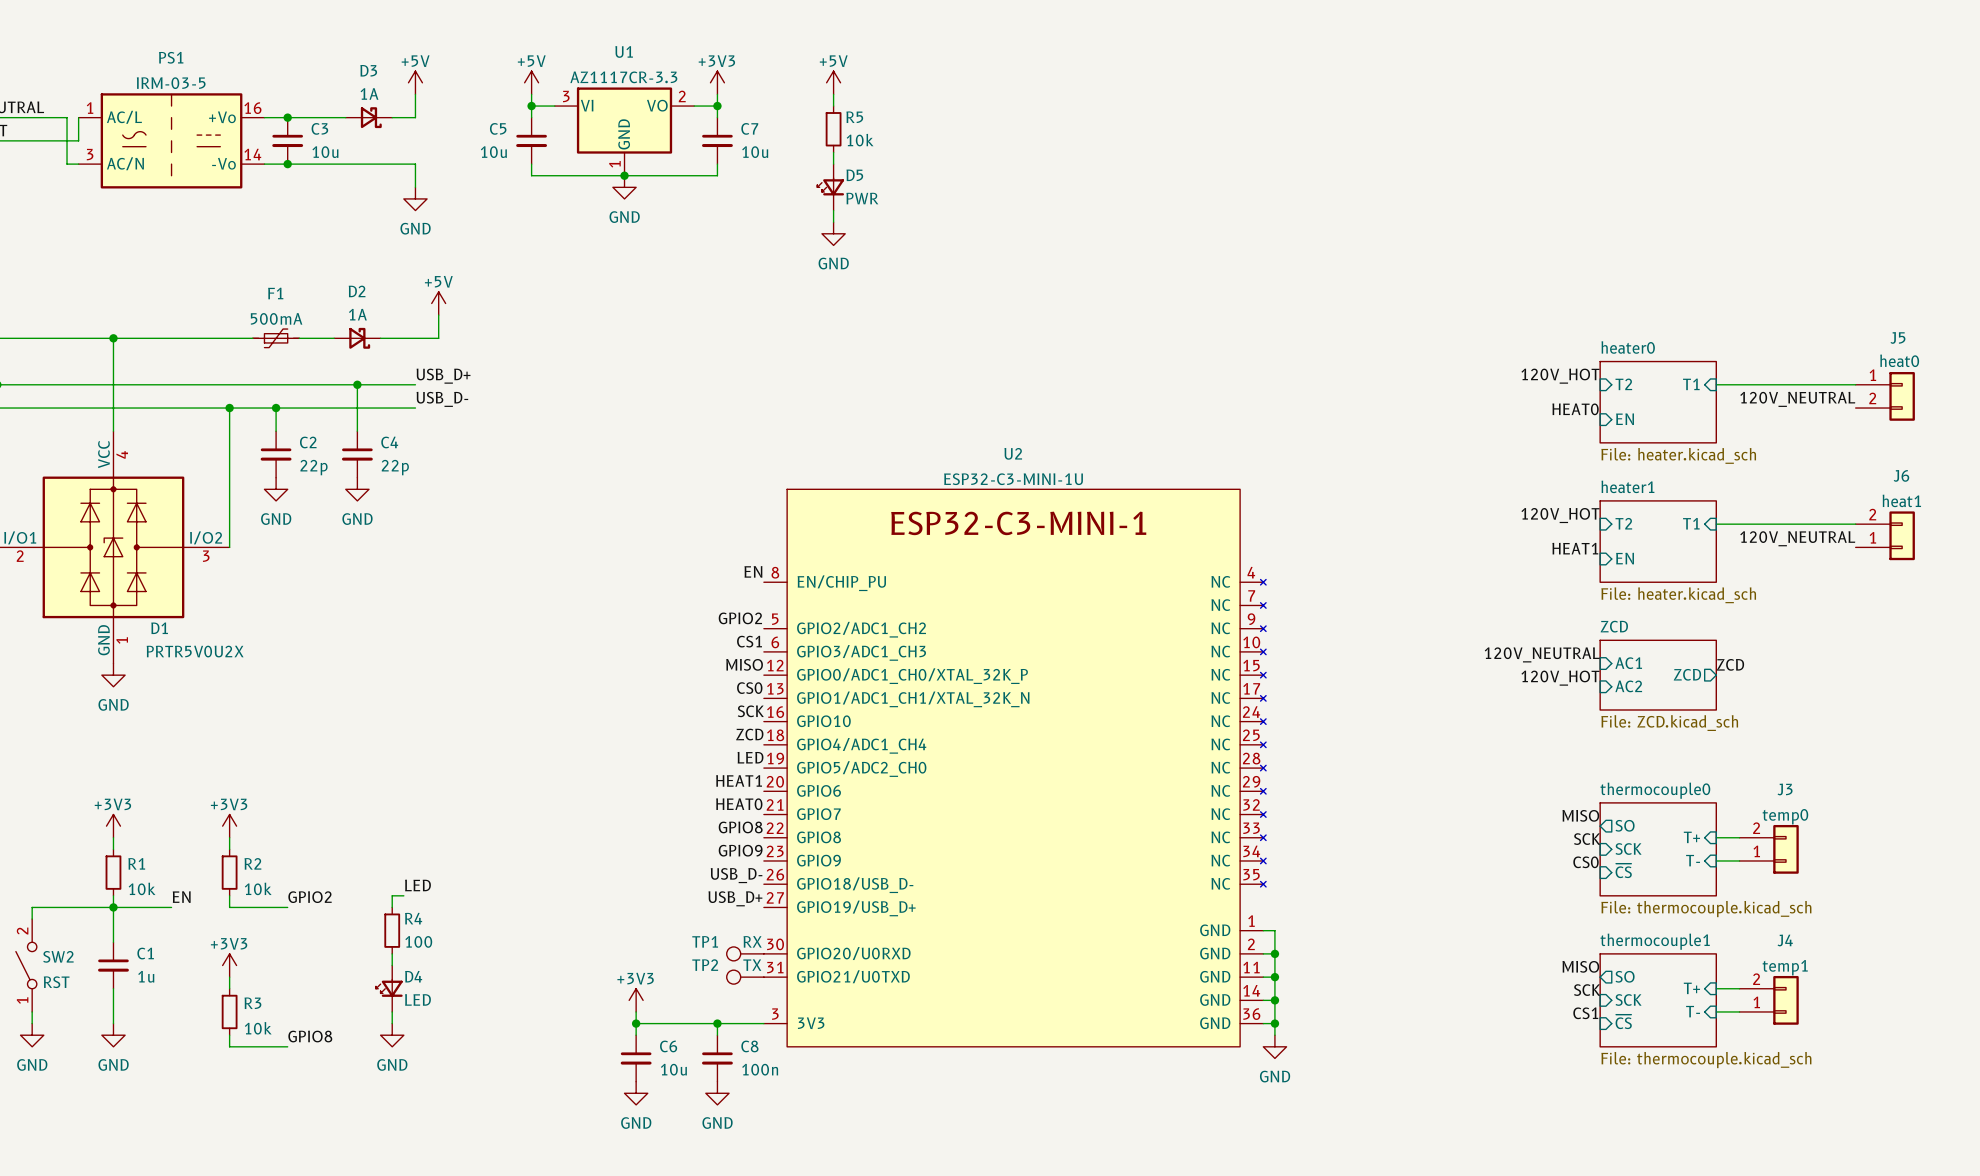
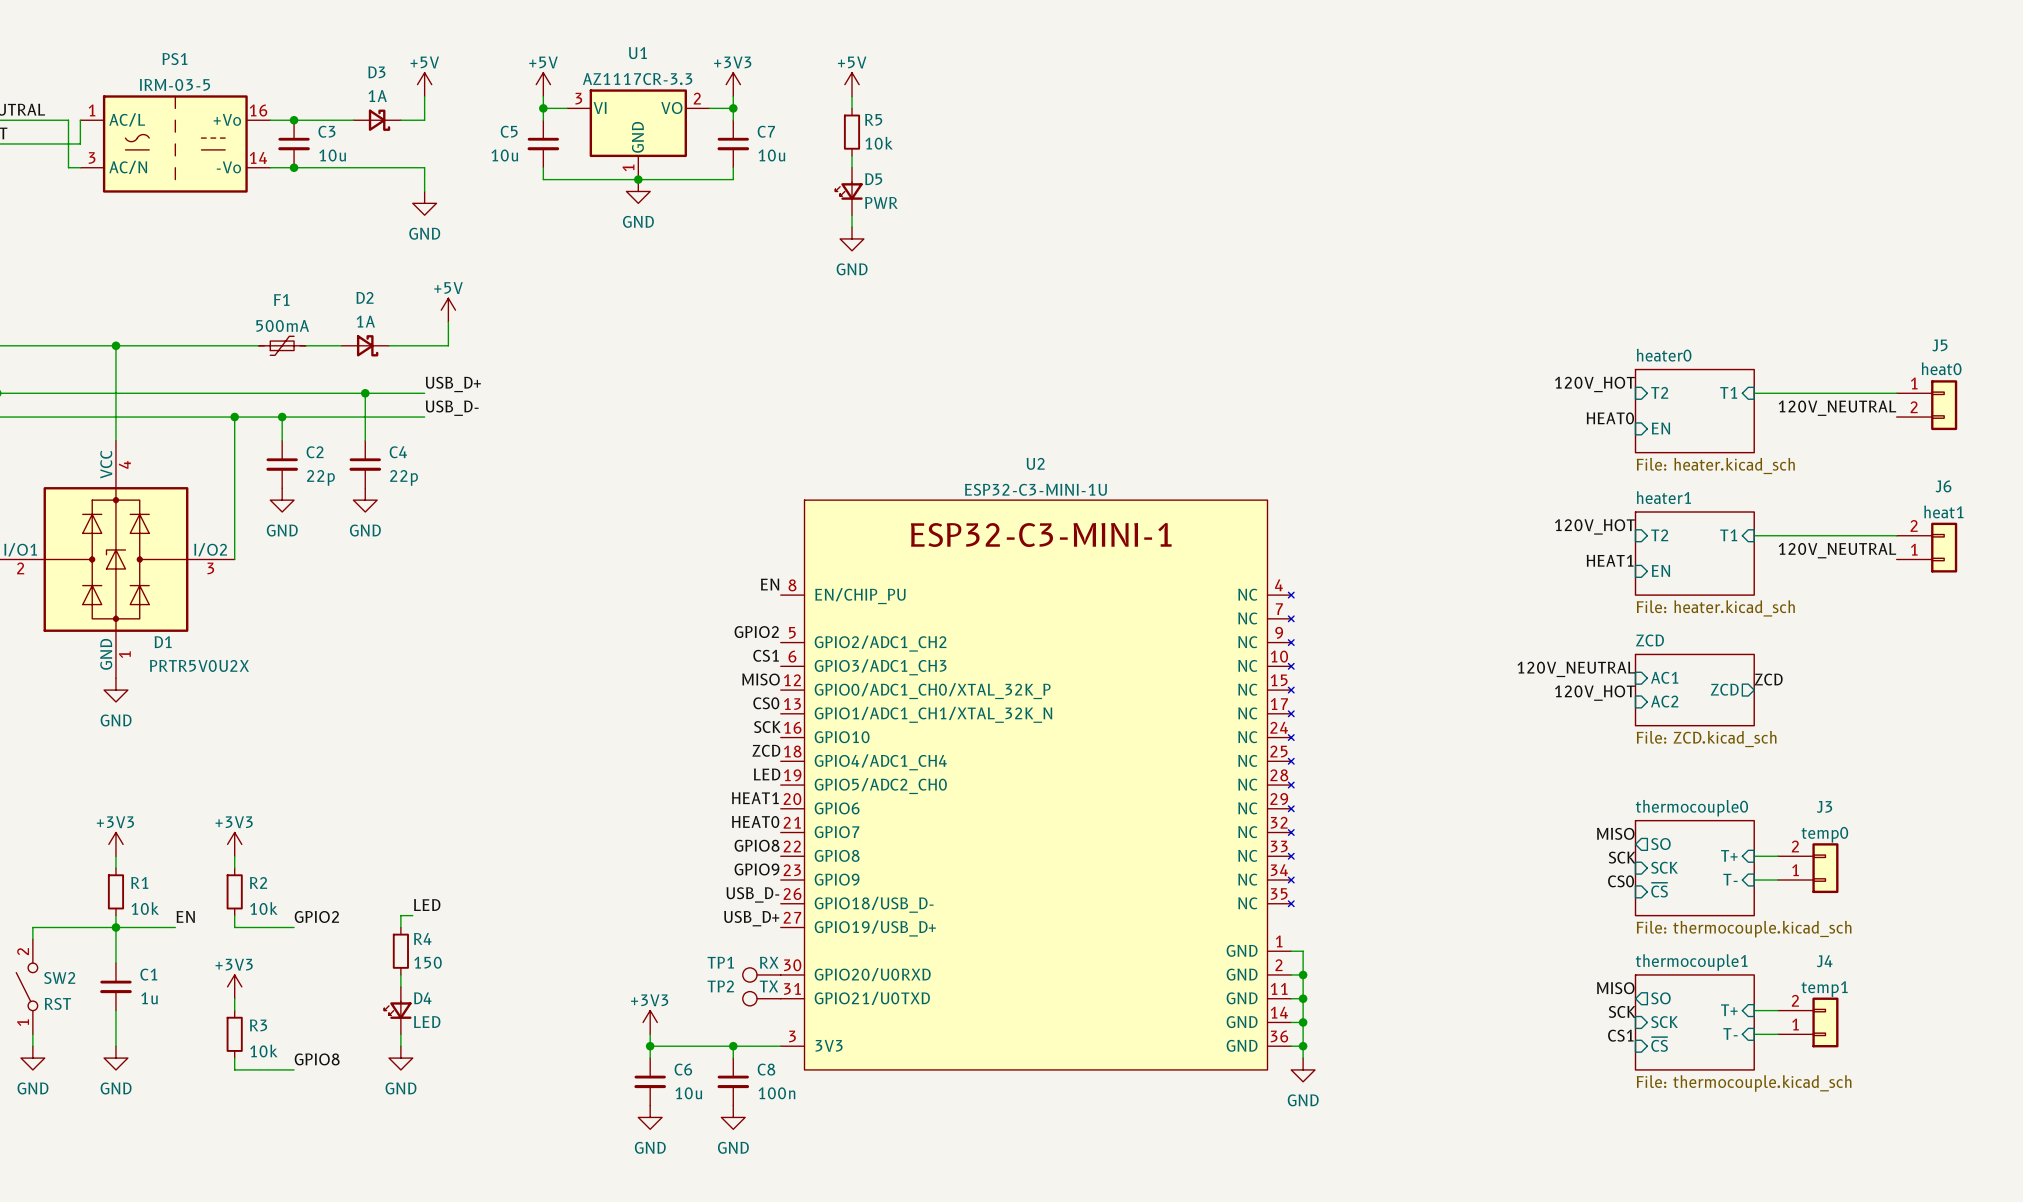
R4 value: 100 (418, 941) -> 150 (428, 962)

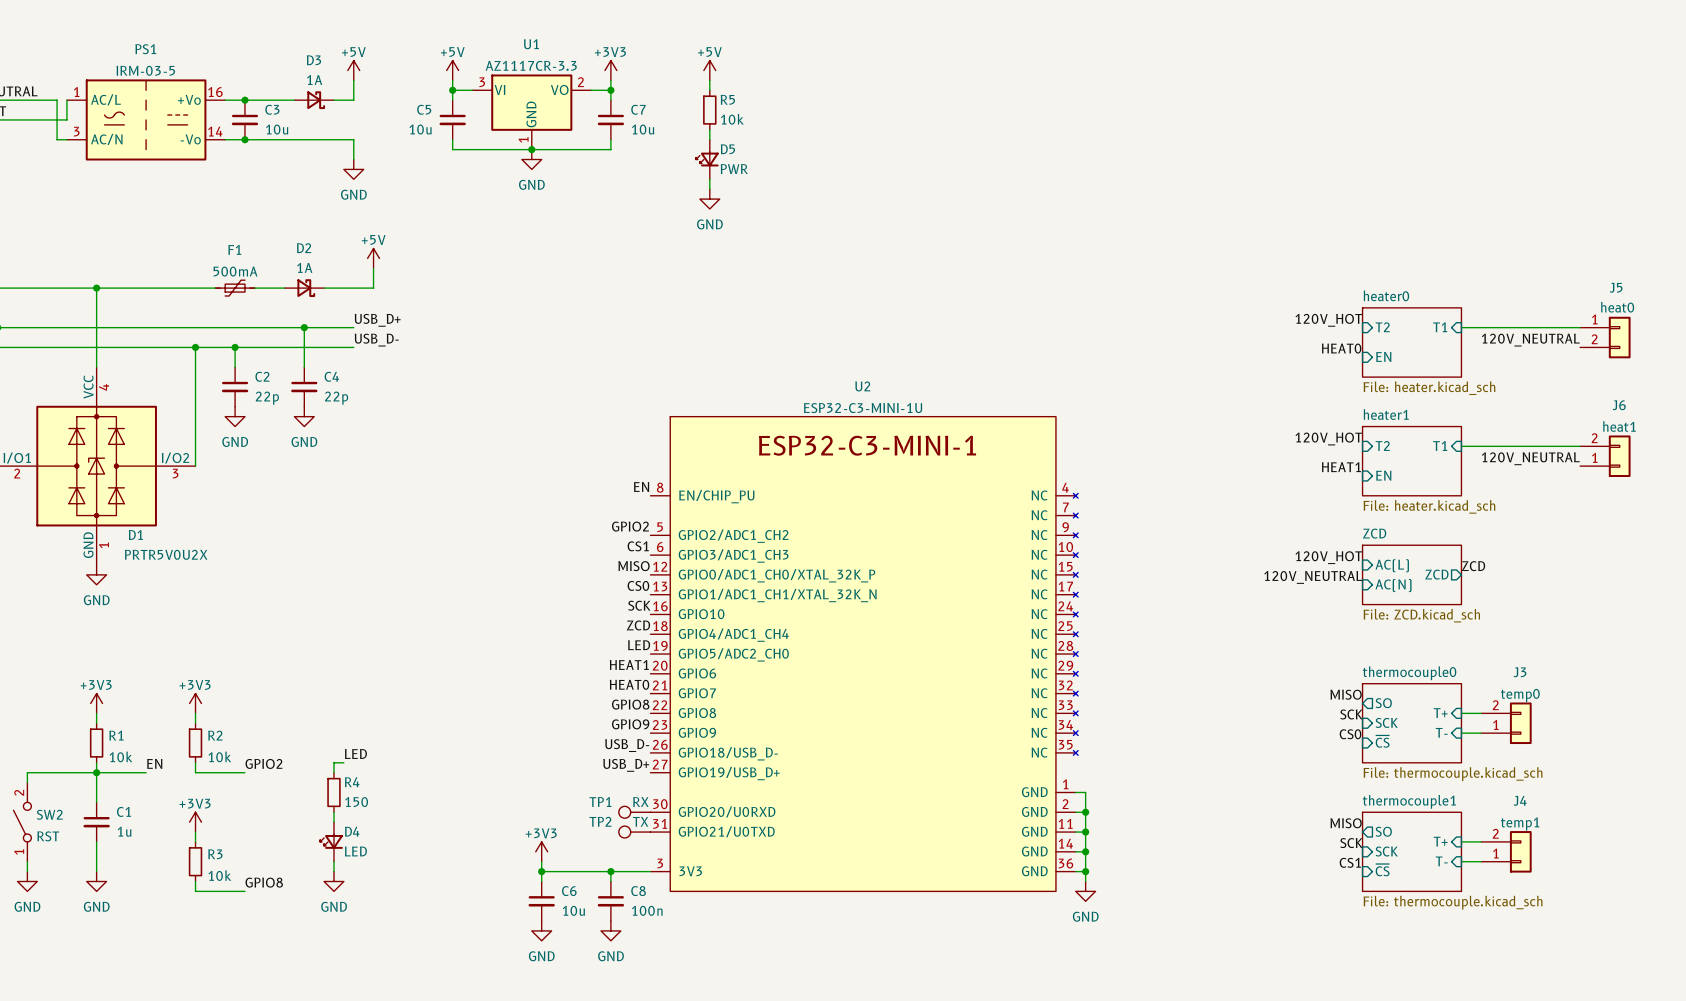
label: 120V_NEUTRAL (1576, 669) -> 120V_HOT (1328, 557)
sheet pin: AC1 (1664, 677) -> AC(L) (1392, 565)
label: 120V_HOT (1594, 693) -> 120V_NEUTRAL (1313, 577)
sheet pin: AC2 (1664, 701) -> AC(N) (1393, 585)

